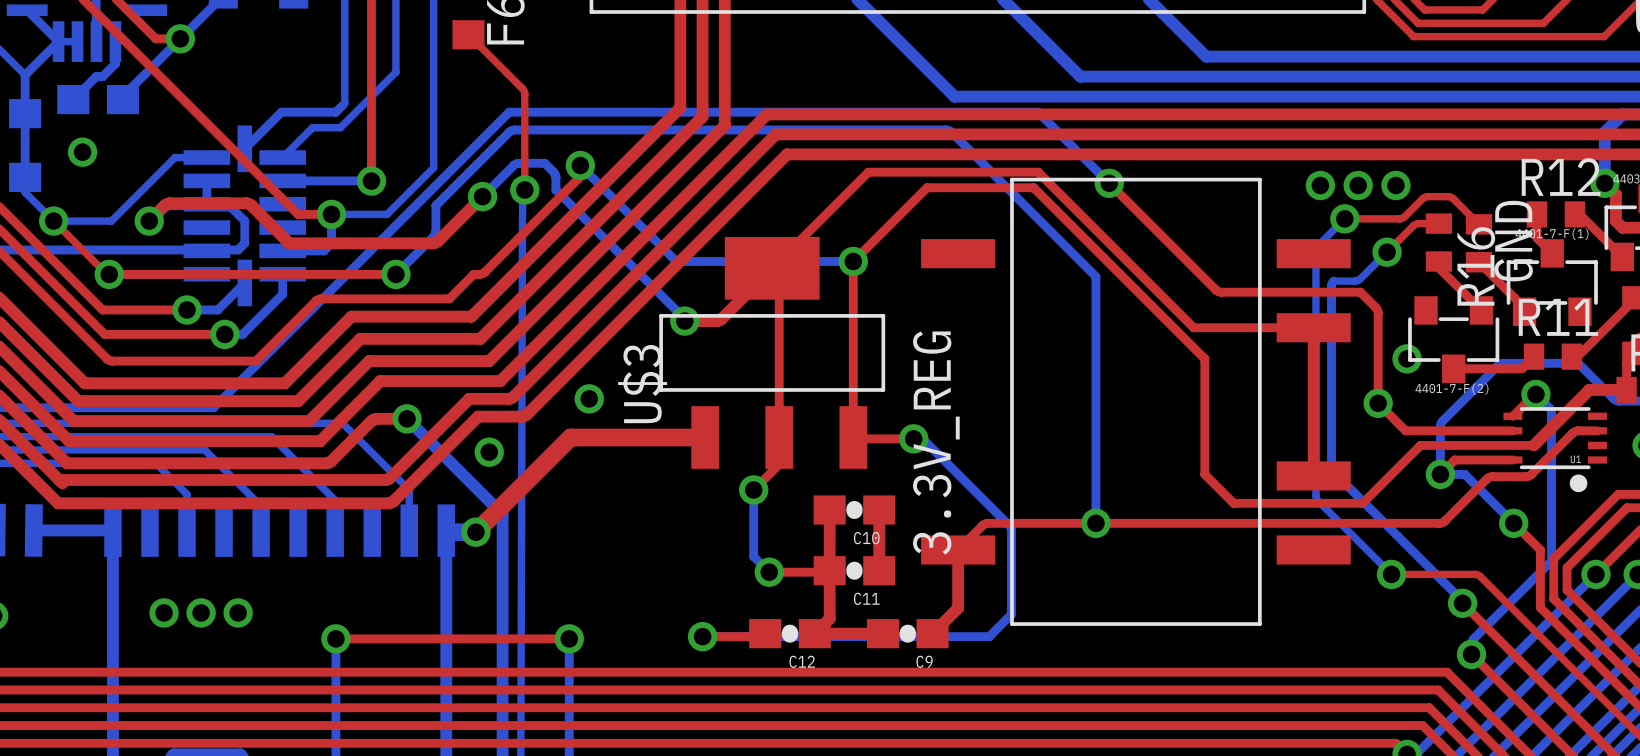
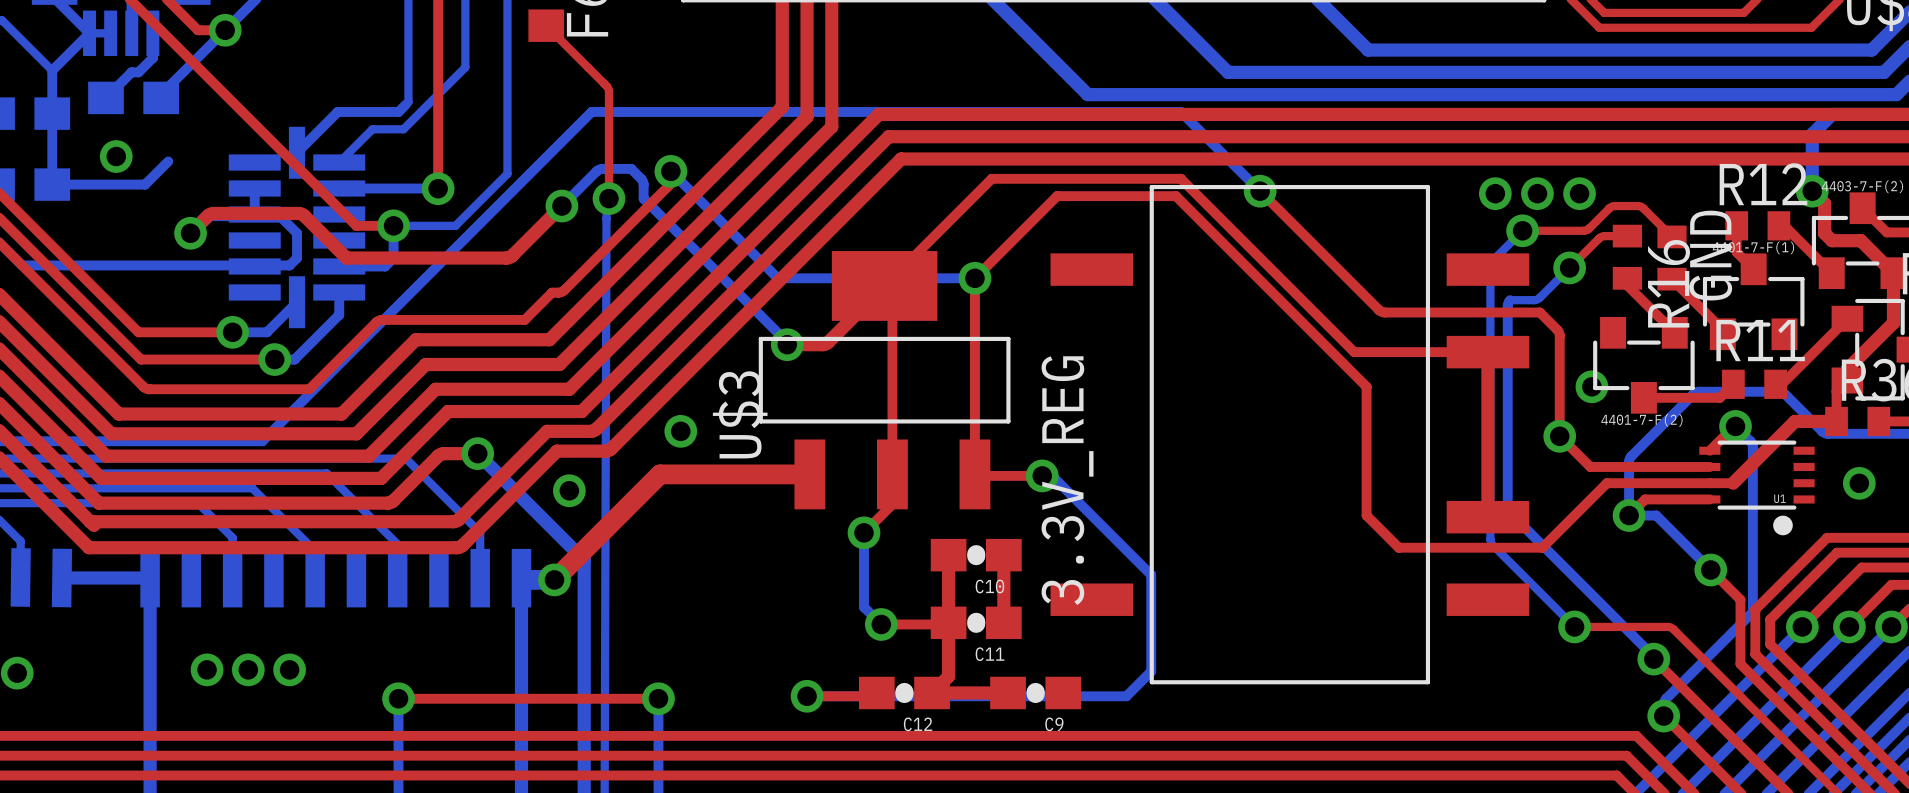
bottom track: (206, 157) (174, 157) (111, 221) (53, 221) (25, 192) (25, 177) -> (168, 161) (145, 184) (52, 184)
top track: (53, 221) (107, 274) (395, 274) -> none
via: (53, 221) -> none
via: (109, 274) -> none
bottom track: (395, 274) (434, 235) (435, 205) (512, 130) (949, 130) (1095, 276) (1095, 523) -> none
via: (395, 274) -> none
top track: (1597, 430) (1574, 431) (1529, 476) (1488, 477) (1440, 523) (985, 523) (958, 549) (958, 608) (932, 633) -> none
via: (1095, 523) -> none

